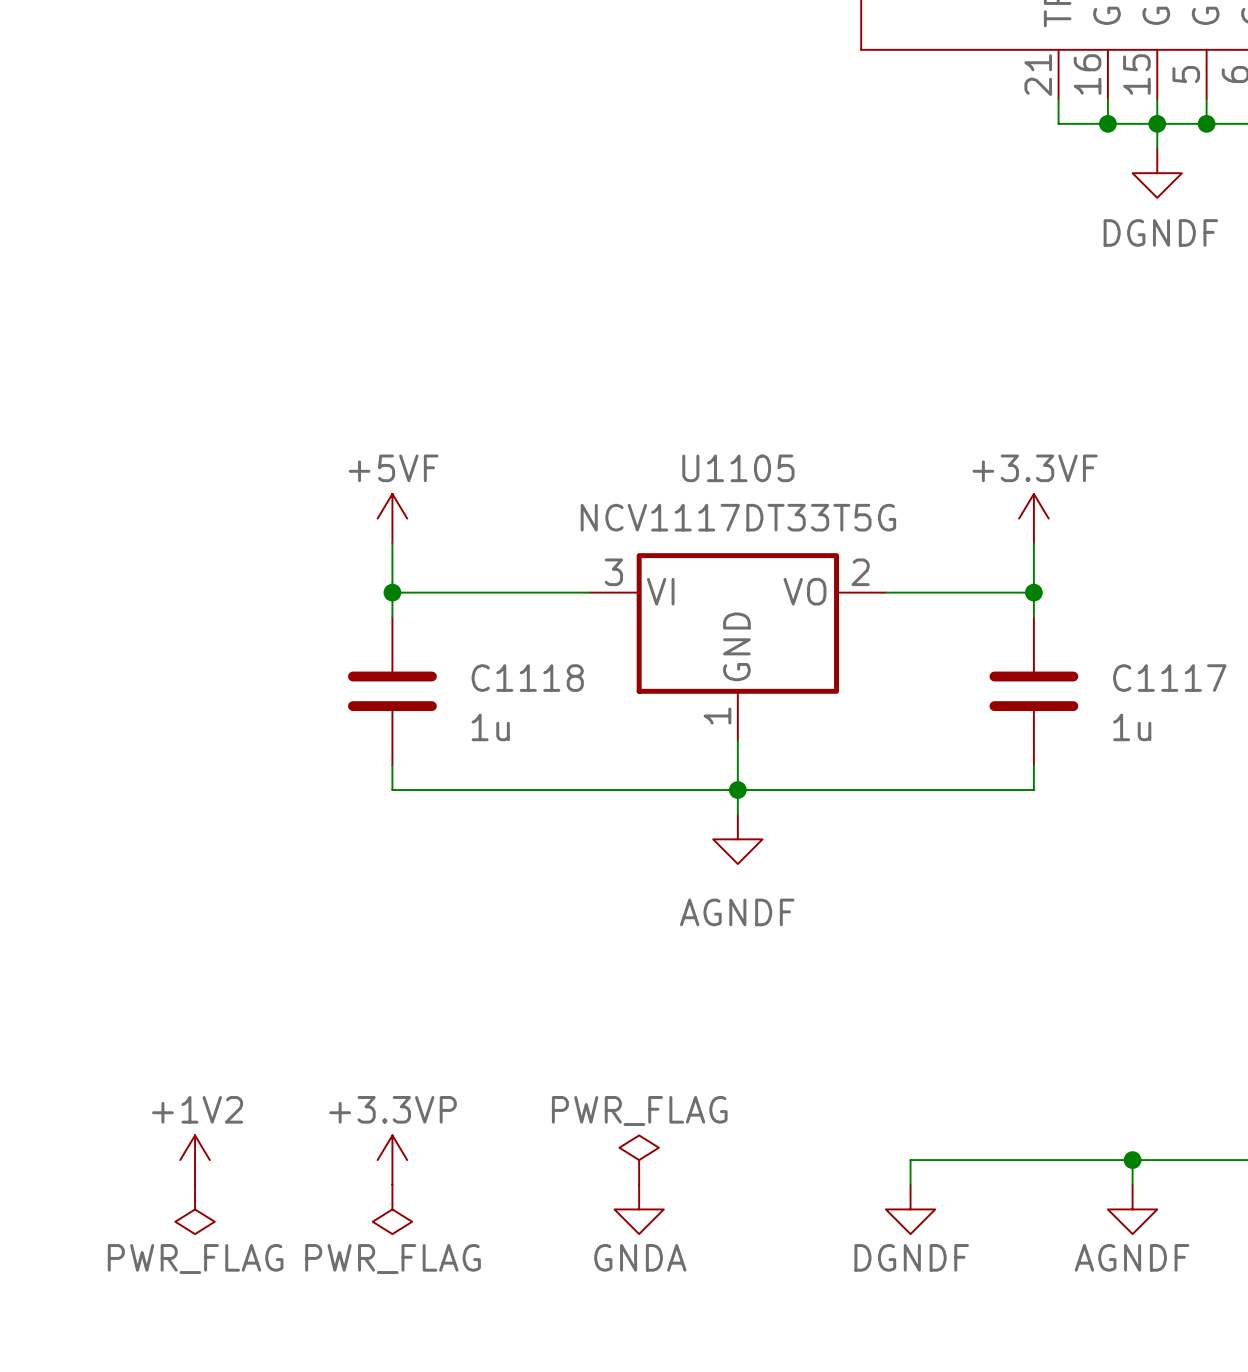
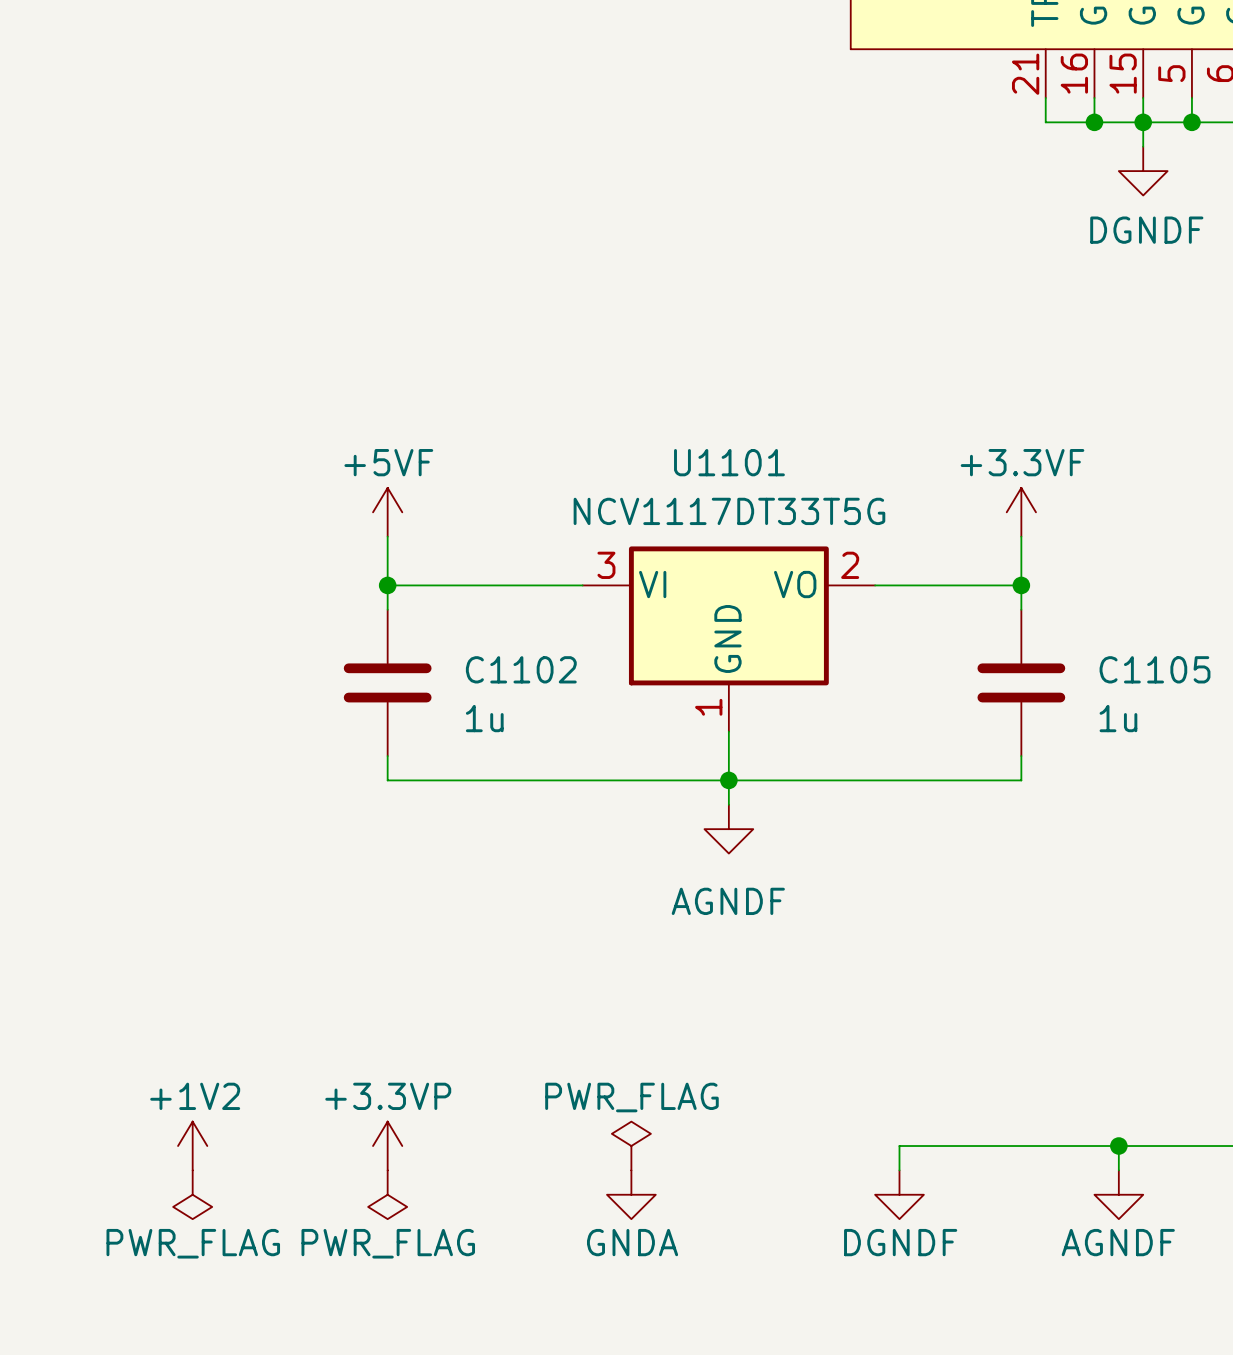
U1105 name: U1105 (738, 468) -> U1101 (729, 462)
C1118 name: C1118 (527, 678) -> C1102 (521, 669)
C1117 name: C1117 (1169, 678) -> C1105 (1155, 669)

